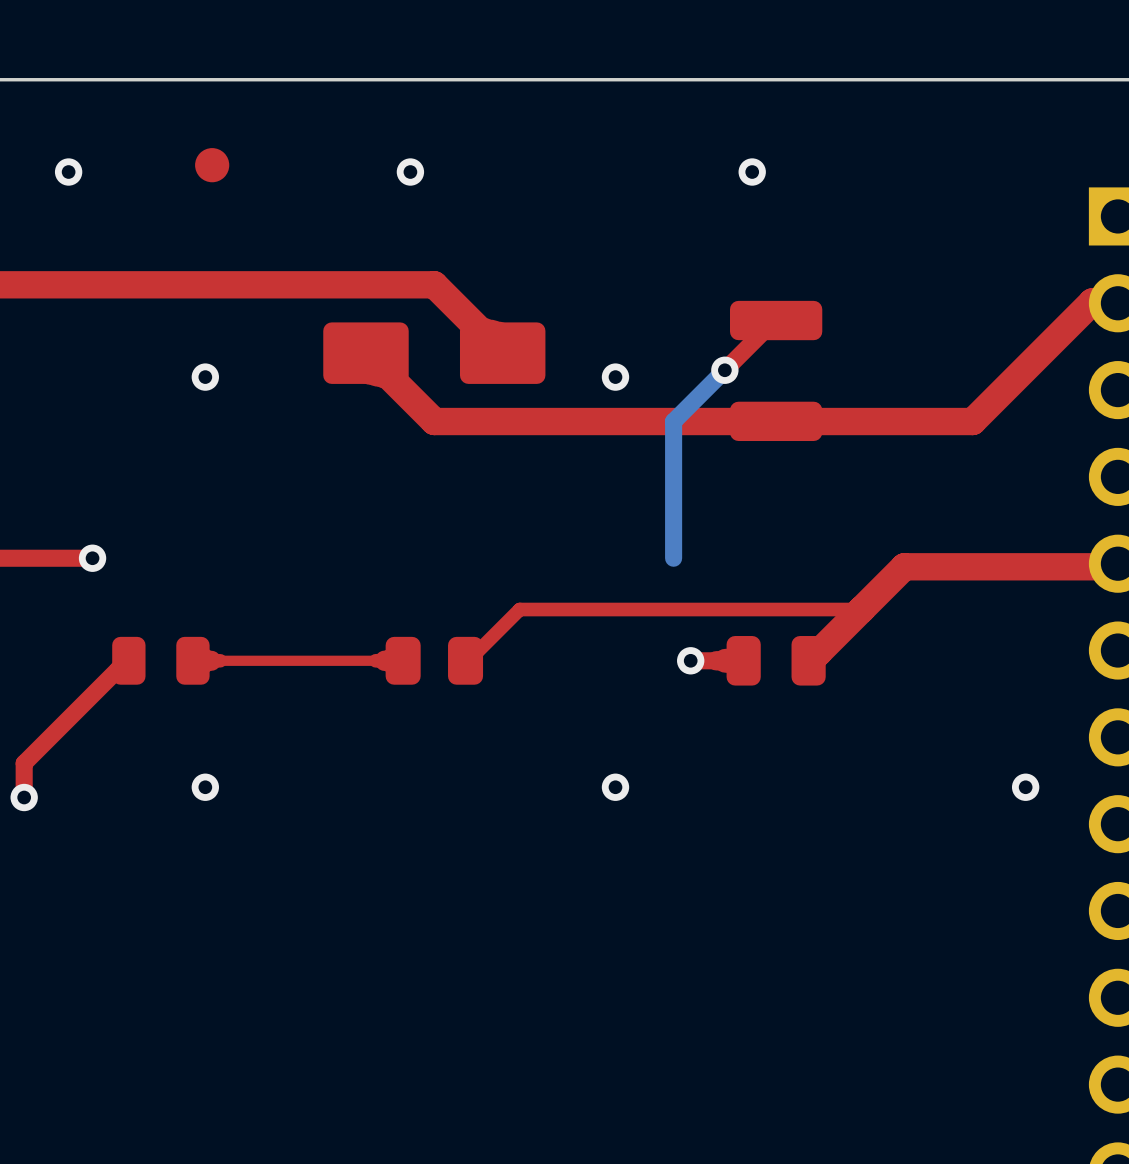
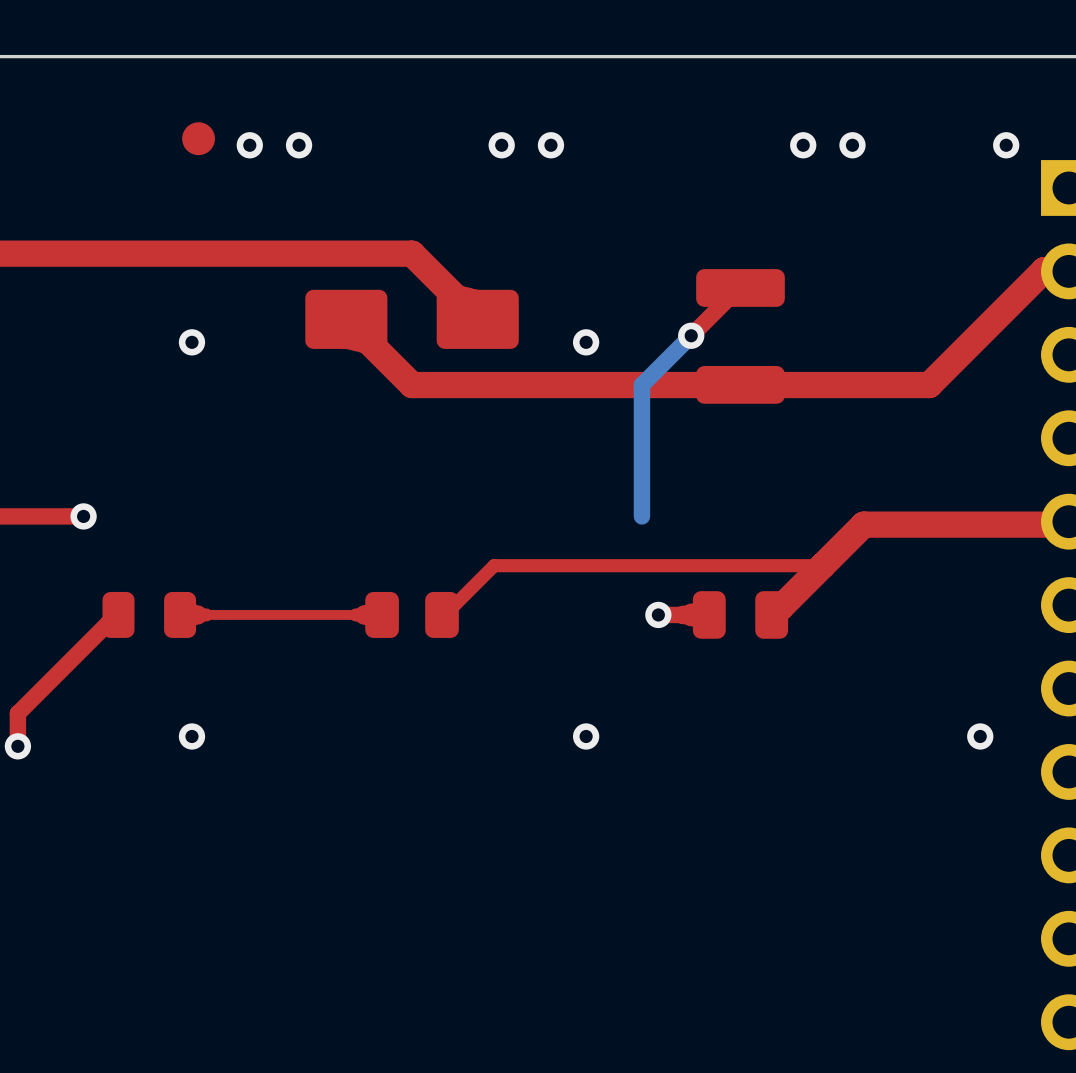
via: (68, 172) -> none
via: none -> (249, 145)
via: none -> (299, 145)
via: (410, 172) -> none
via: none -> (501, 145)
via: none -> (550, 145)
via: (752, 172) -> none
via: none -> (803, 145)
via: none -> (852, 145)
via: none -> (1006, 145)

